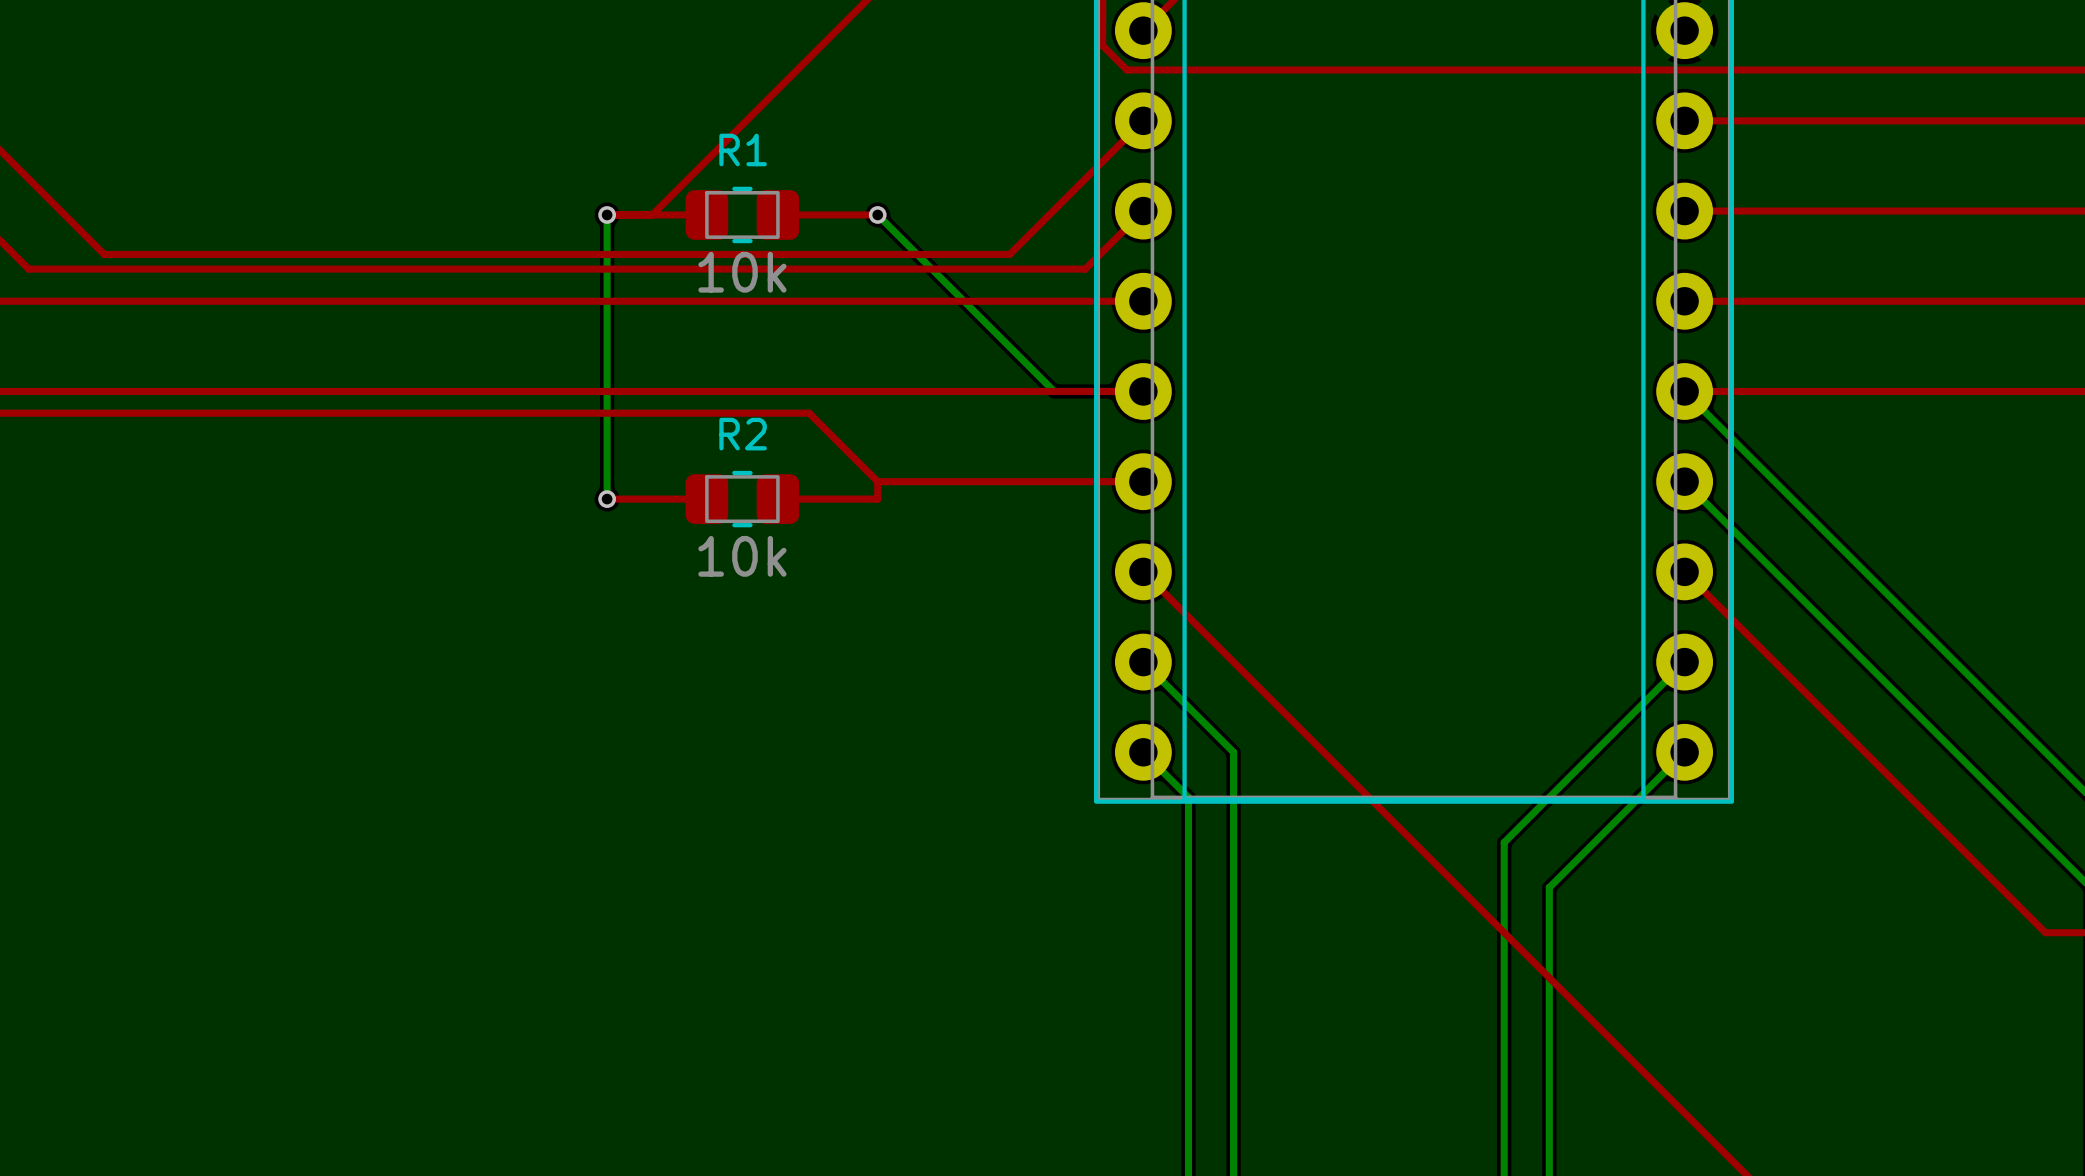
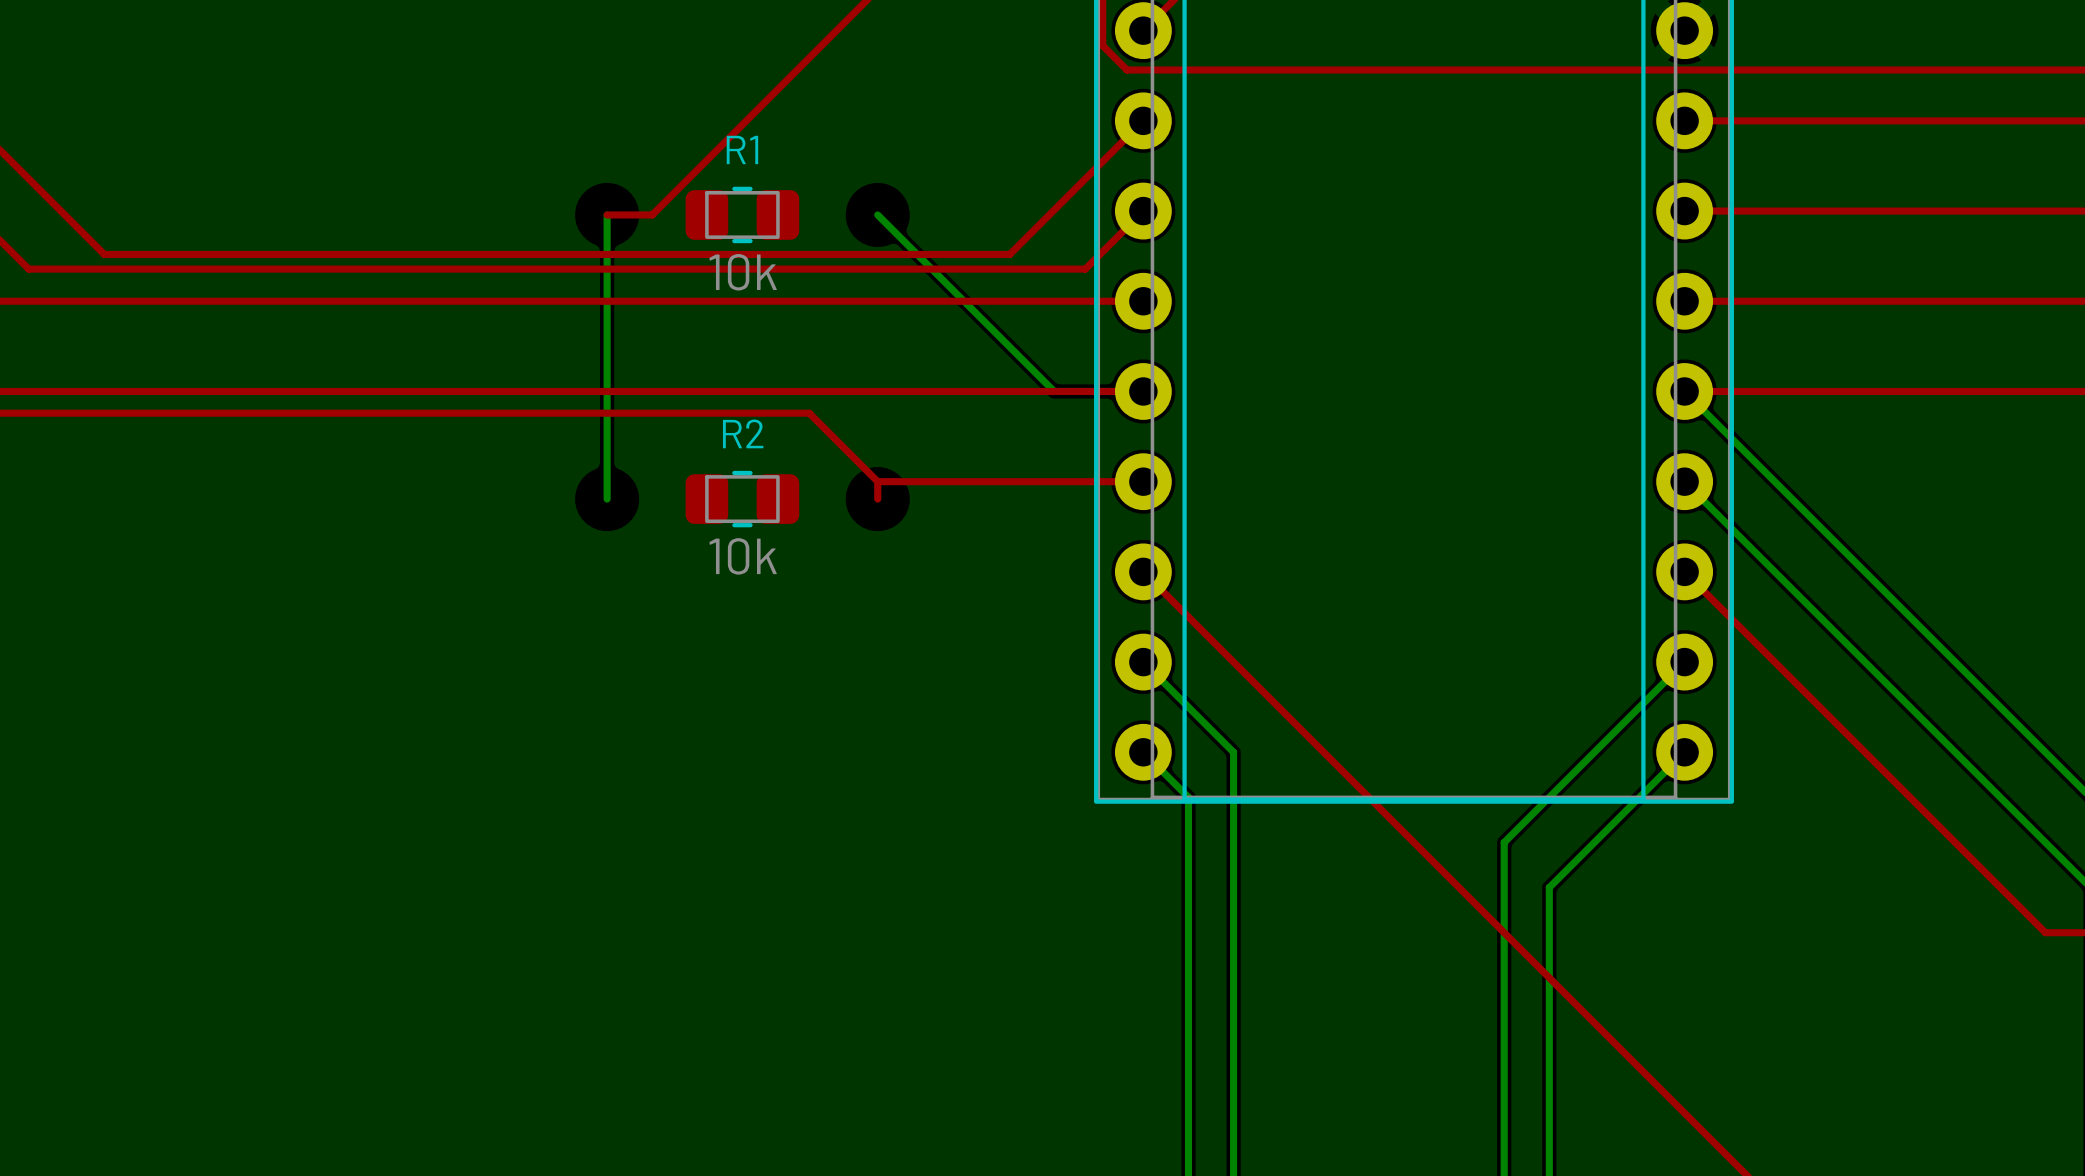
via: (607, 214) -> none
top track: (652, 214) (706, 214) -> none
top track: (777, 214) (877, 214) -> none
via: (877, 214) -> none
top track: (607, 499) (706, 499) -> none
via: (607, 499) -> none
top track: (777, 499) (877, 499) -> none

